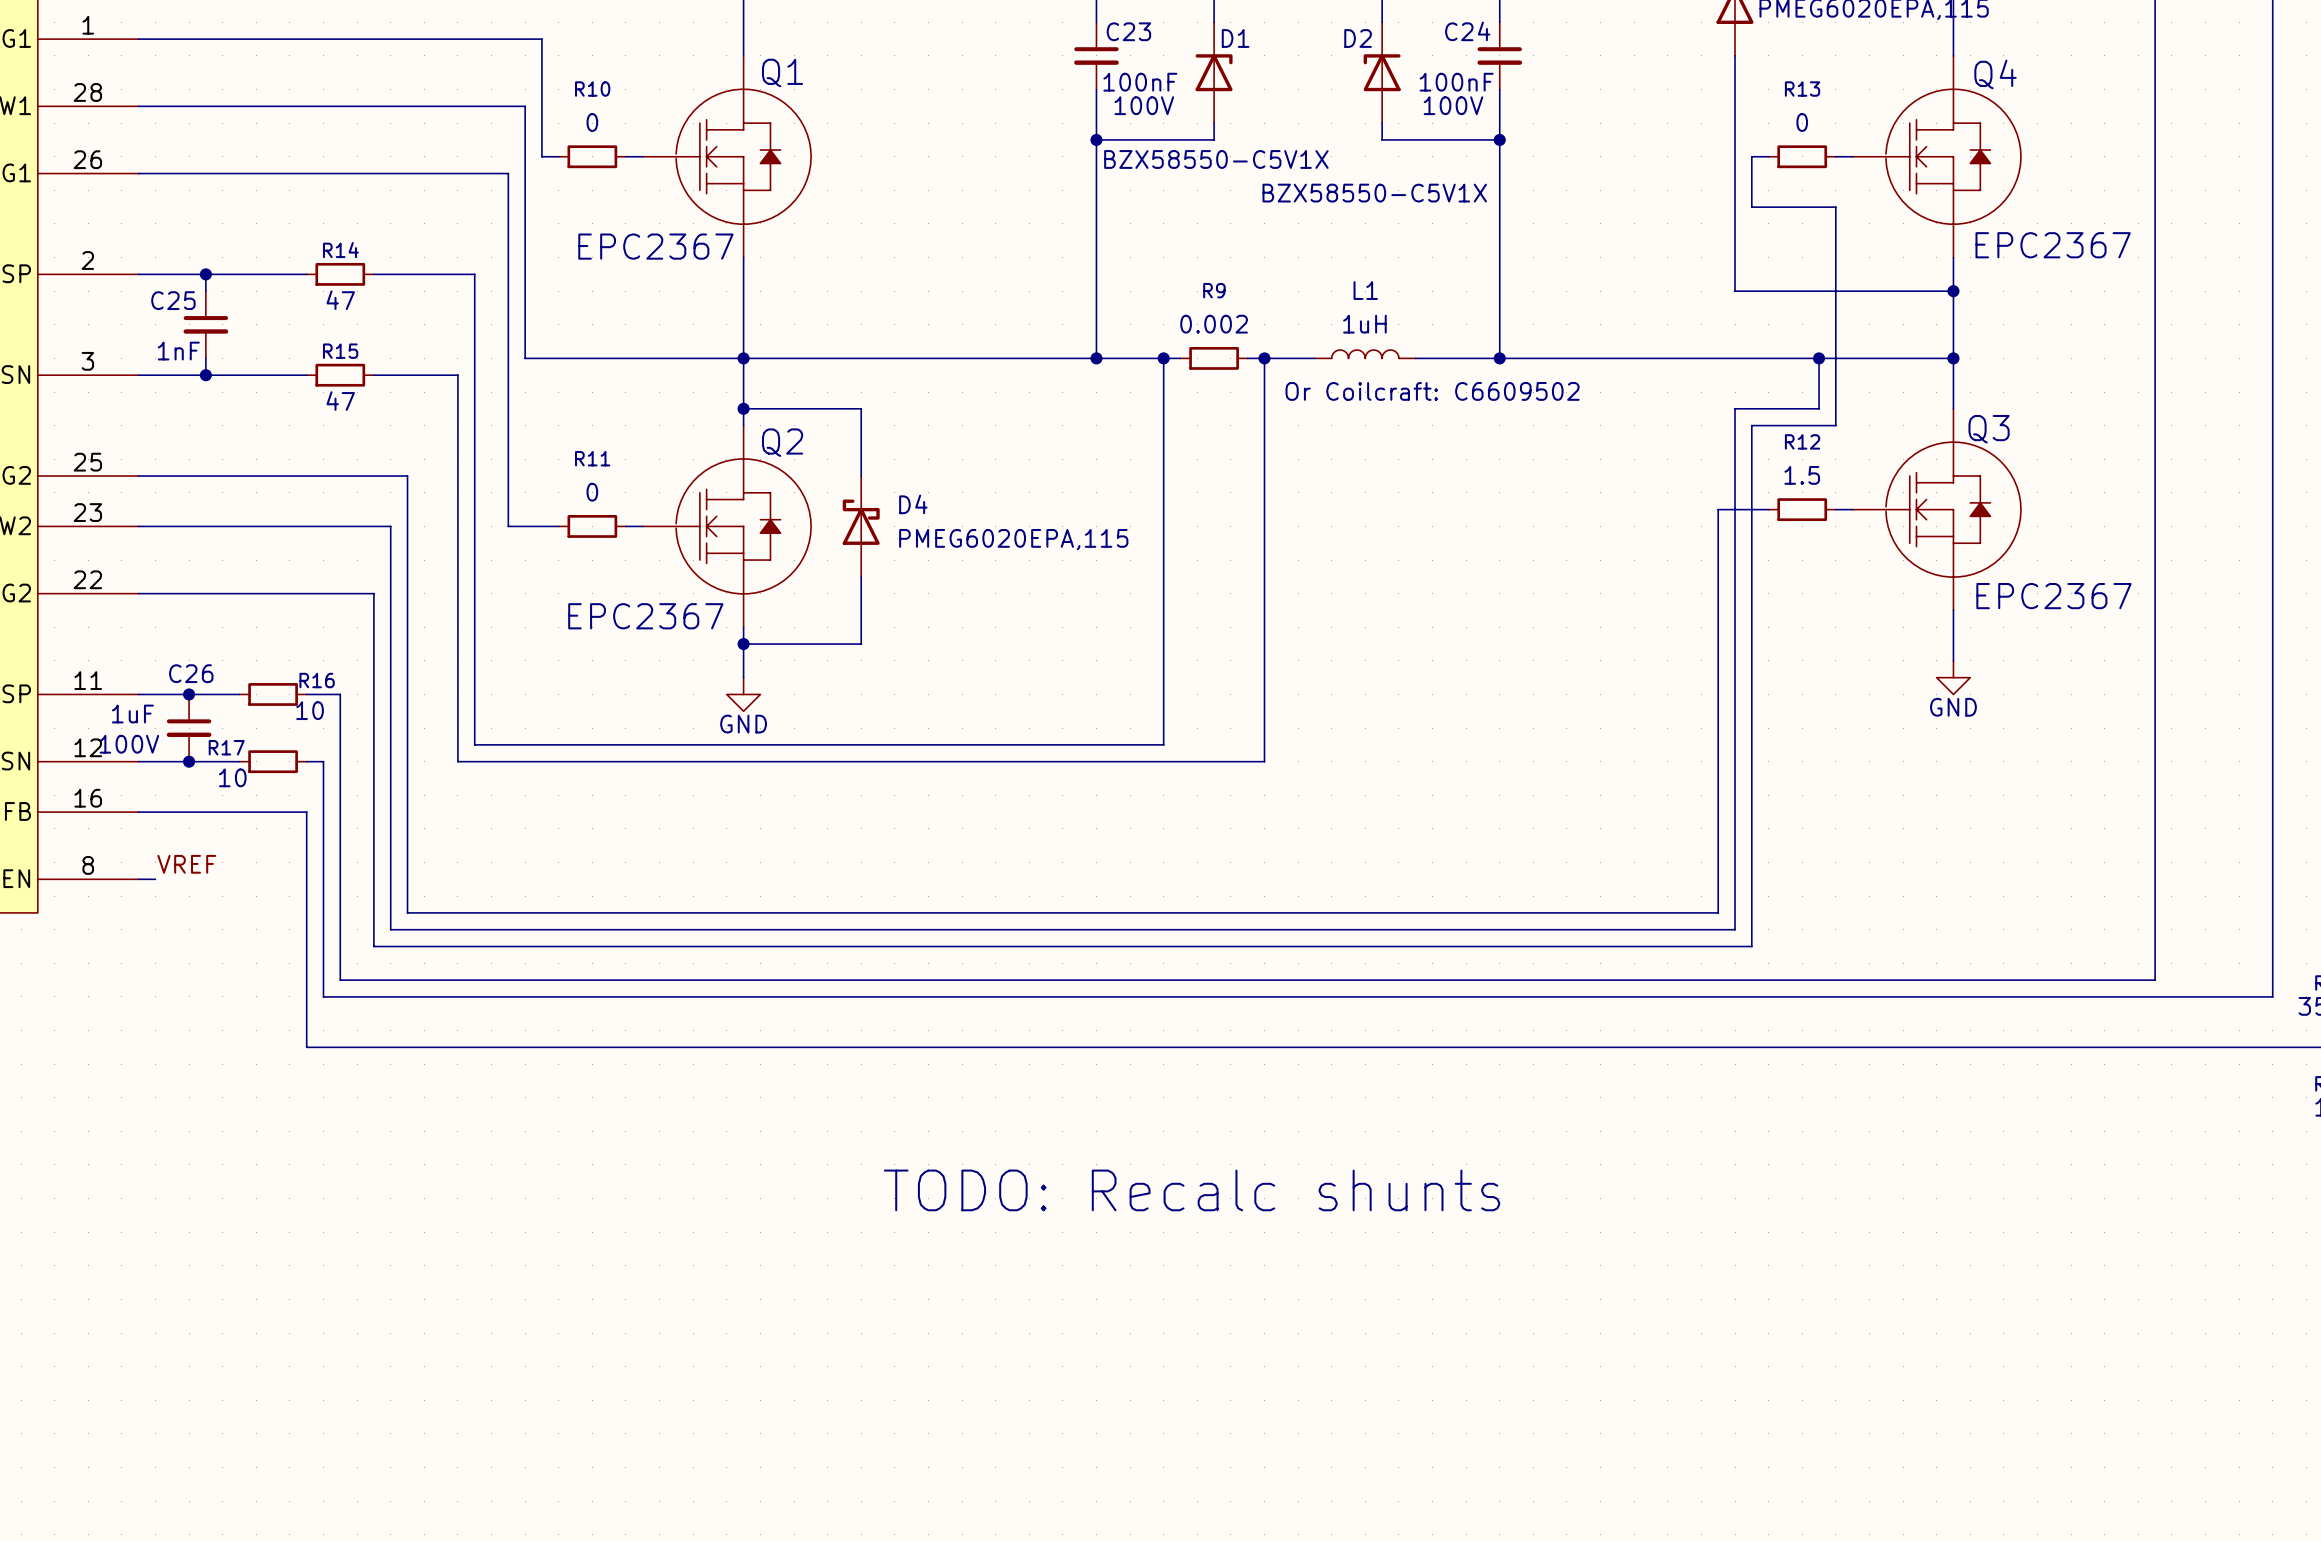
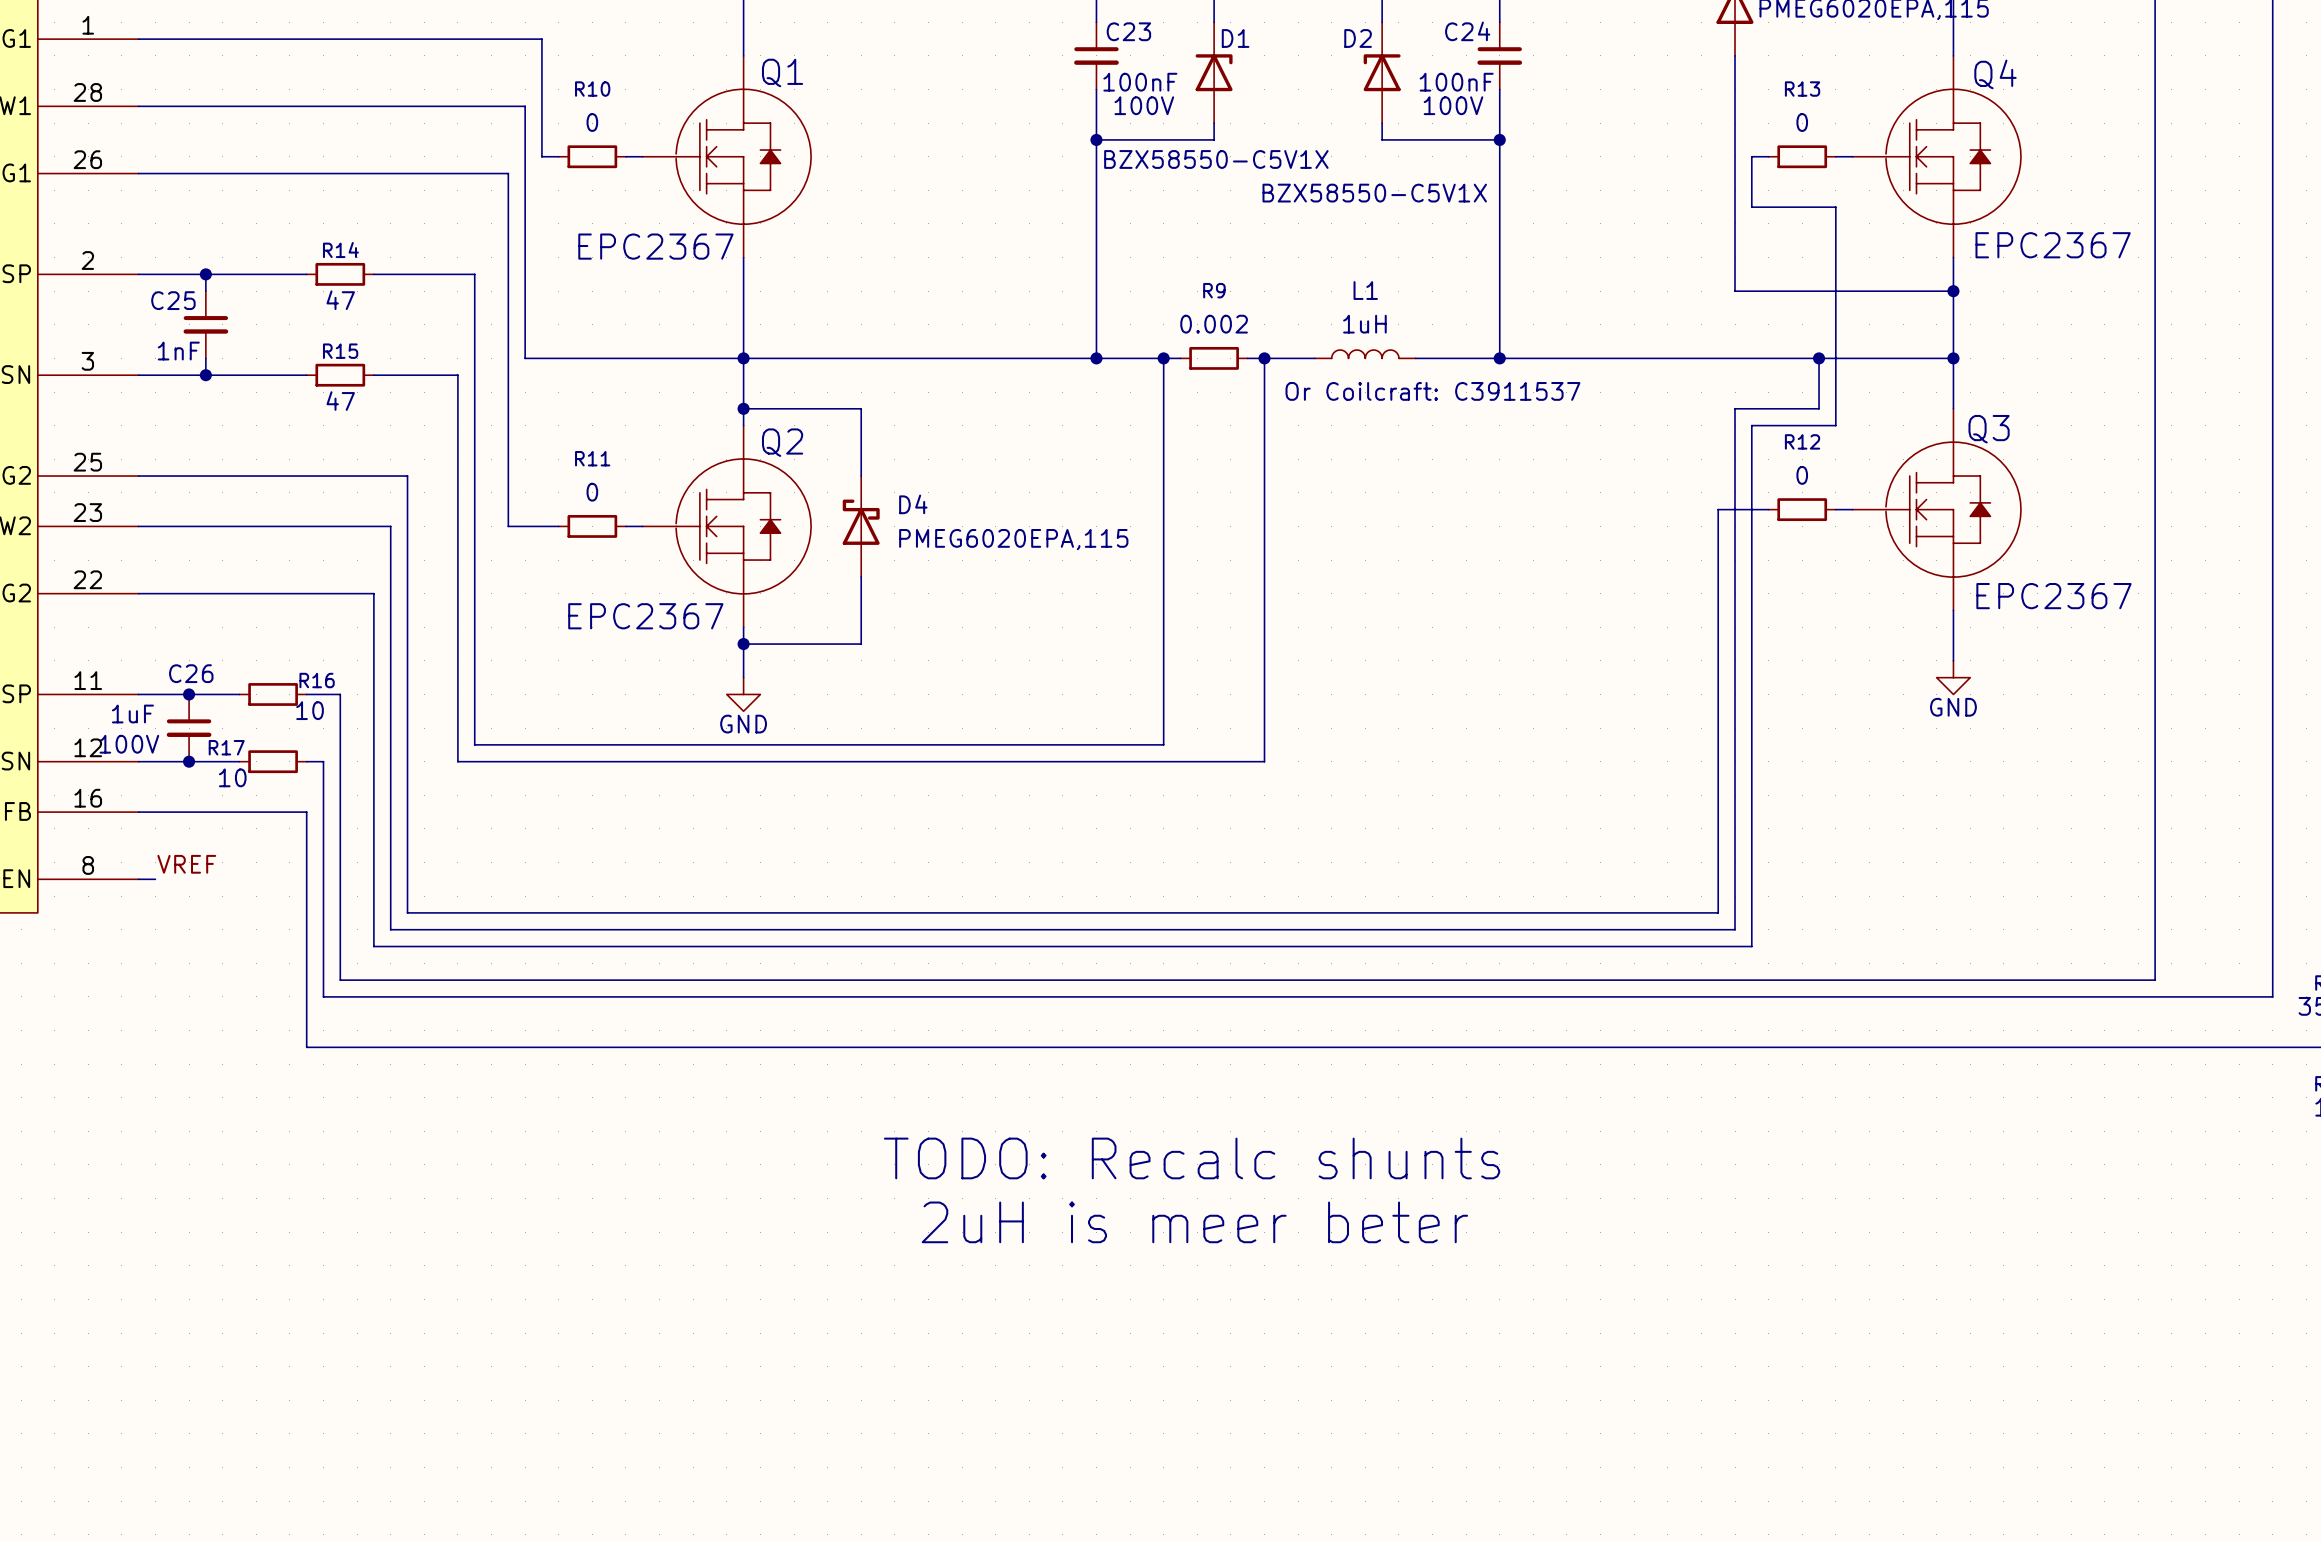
text: Or Coilcraft: C6609502 (1432, 391) -> Or Coilcraft: C3911537 (1432, 391)
R12 value: 1.5 (1802, 475) -> 0 (1802, 475)
text position: TODO: Recalc shunts (1192, 1190) -> TODO: Recalc shunts (1192, 1158)
text: none -> 2uH is meer beter (1194, 1222)

